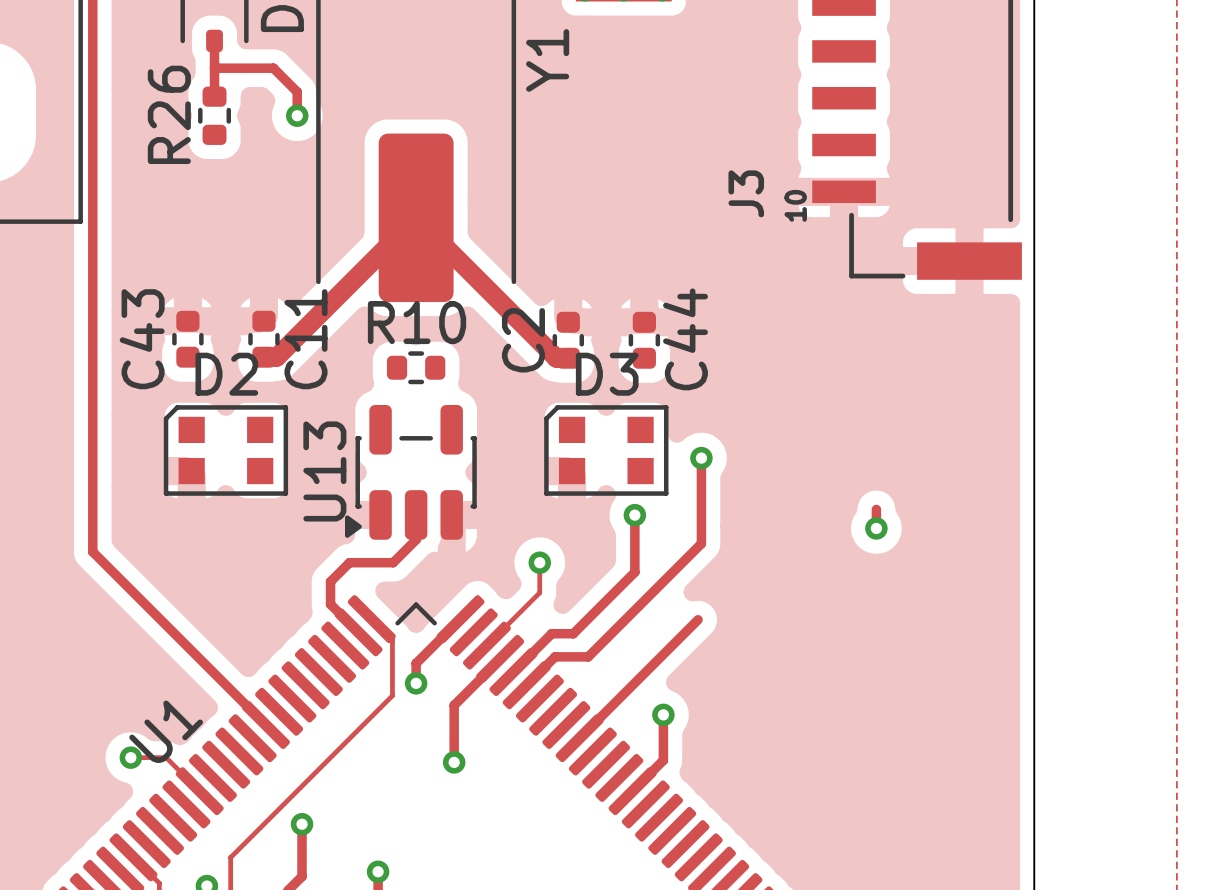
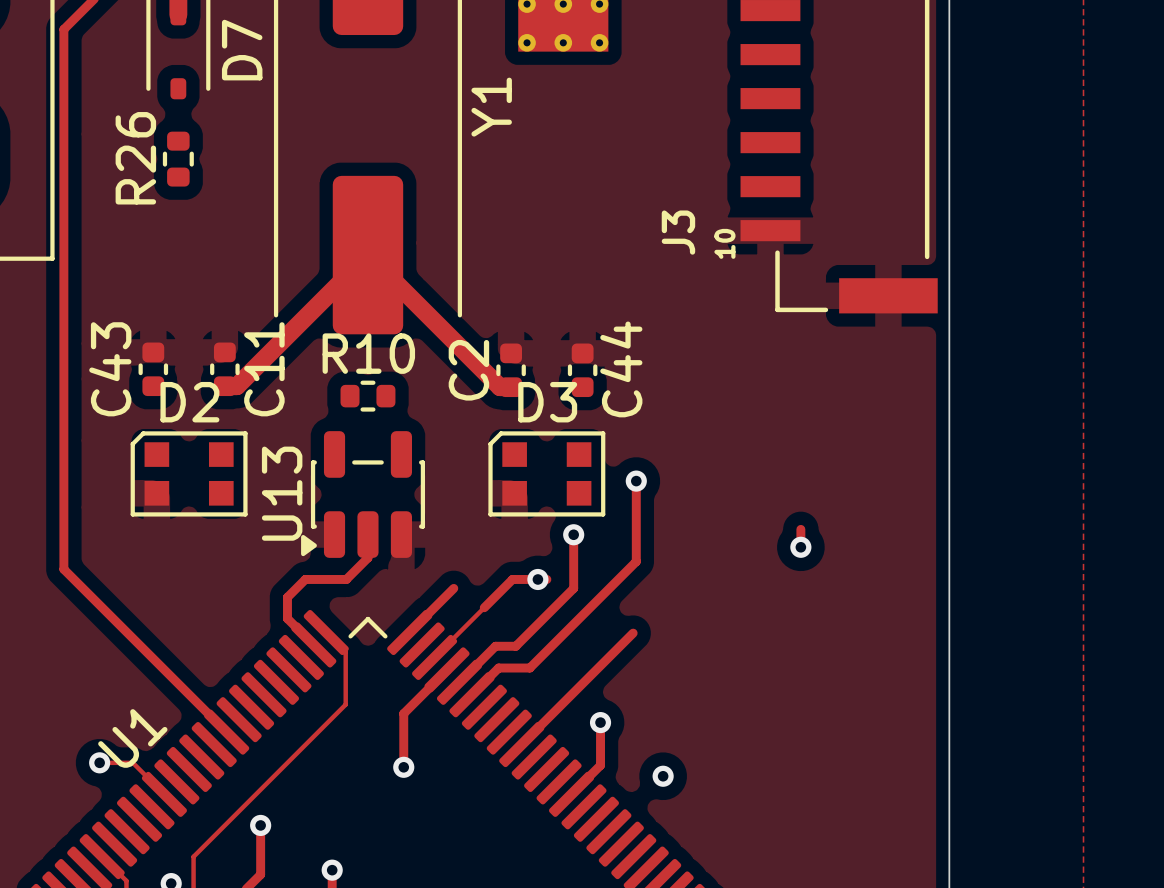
track: (214, 40) (214, 96) -> none
track: (214, 68) (273, 68) (297, 91) (297, 115) -> none
via: (297, 115) -> none
track: (539, 562) (539, 592) -> (546, 579) (512, 579) (484, 607)
via position: (539, 562) -> (537, 579)
track: (460, 619) (416, 663) (416, 683) -> (409, 632) (453, 588)
via: (416, 683) -> none
via: none -> (663, 776)

